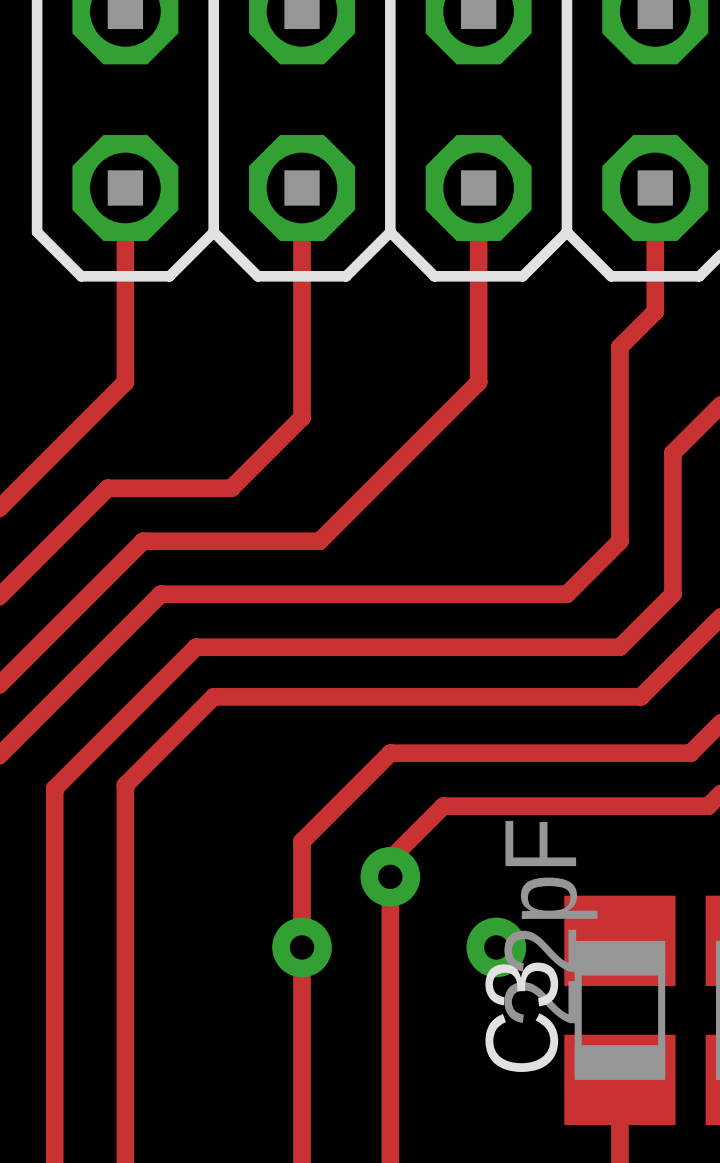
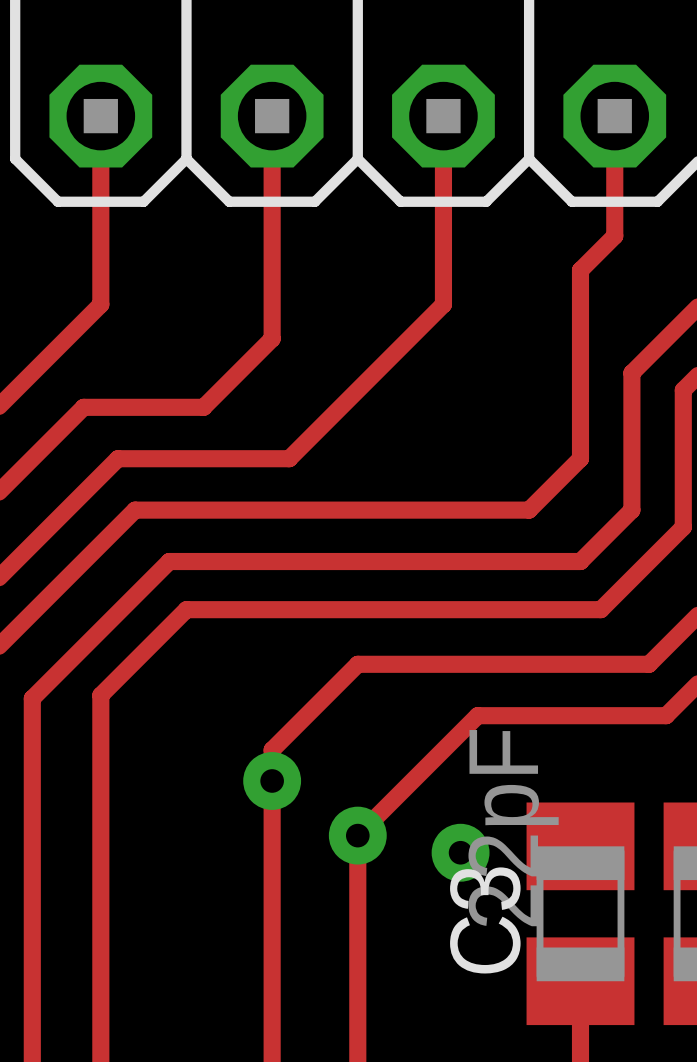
track: (513, 806) (443, 806) (390, 859) (390, 929) -> (477, 715) (357, 835)
via: none -> (272, 780)
via position: (390, 876) -> (357, 835)
via: (302, 947) -> none

